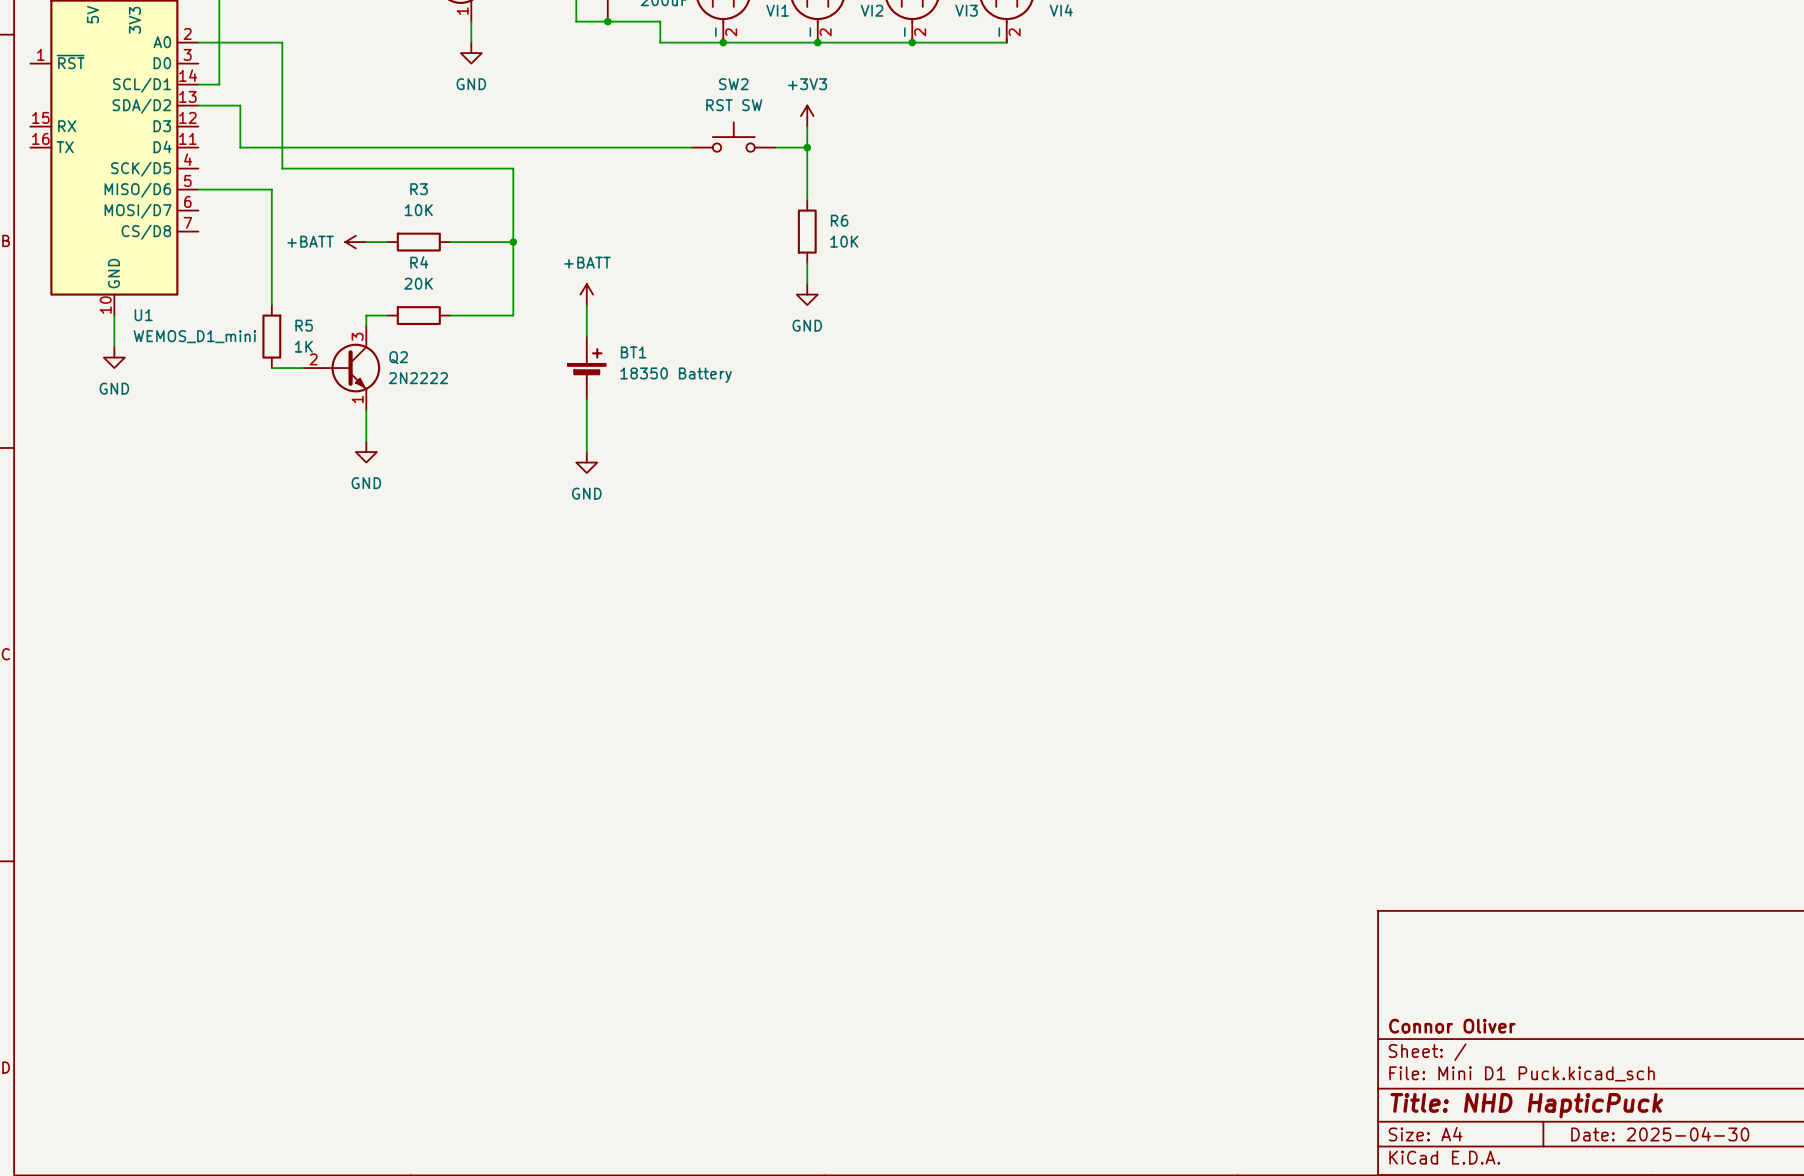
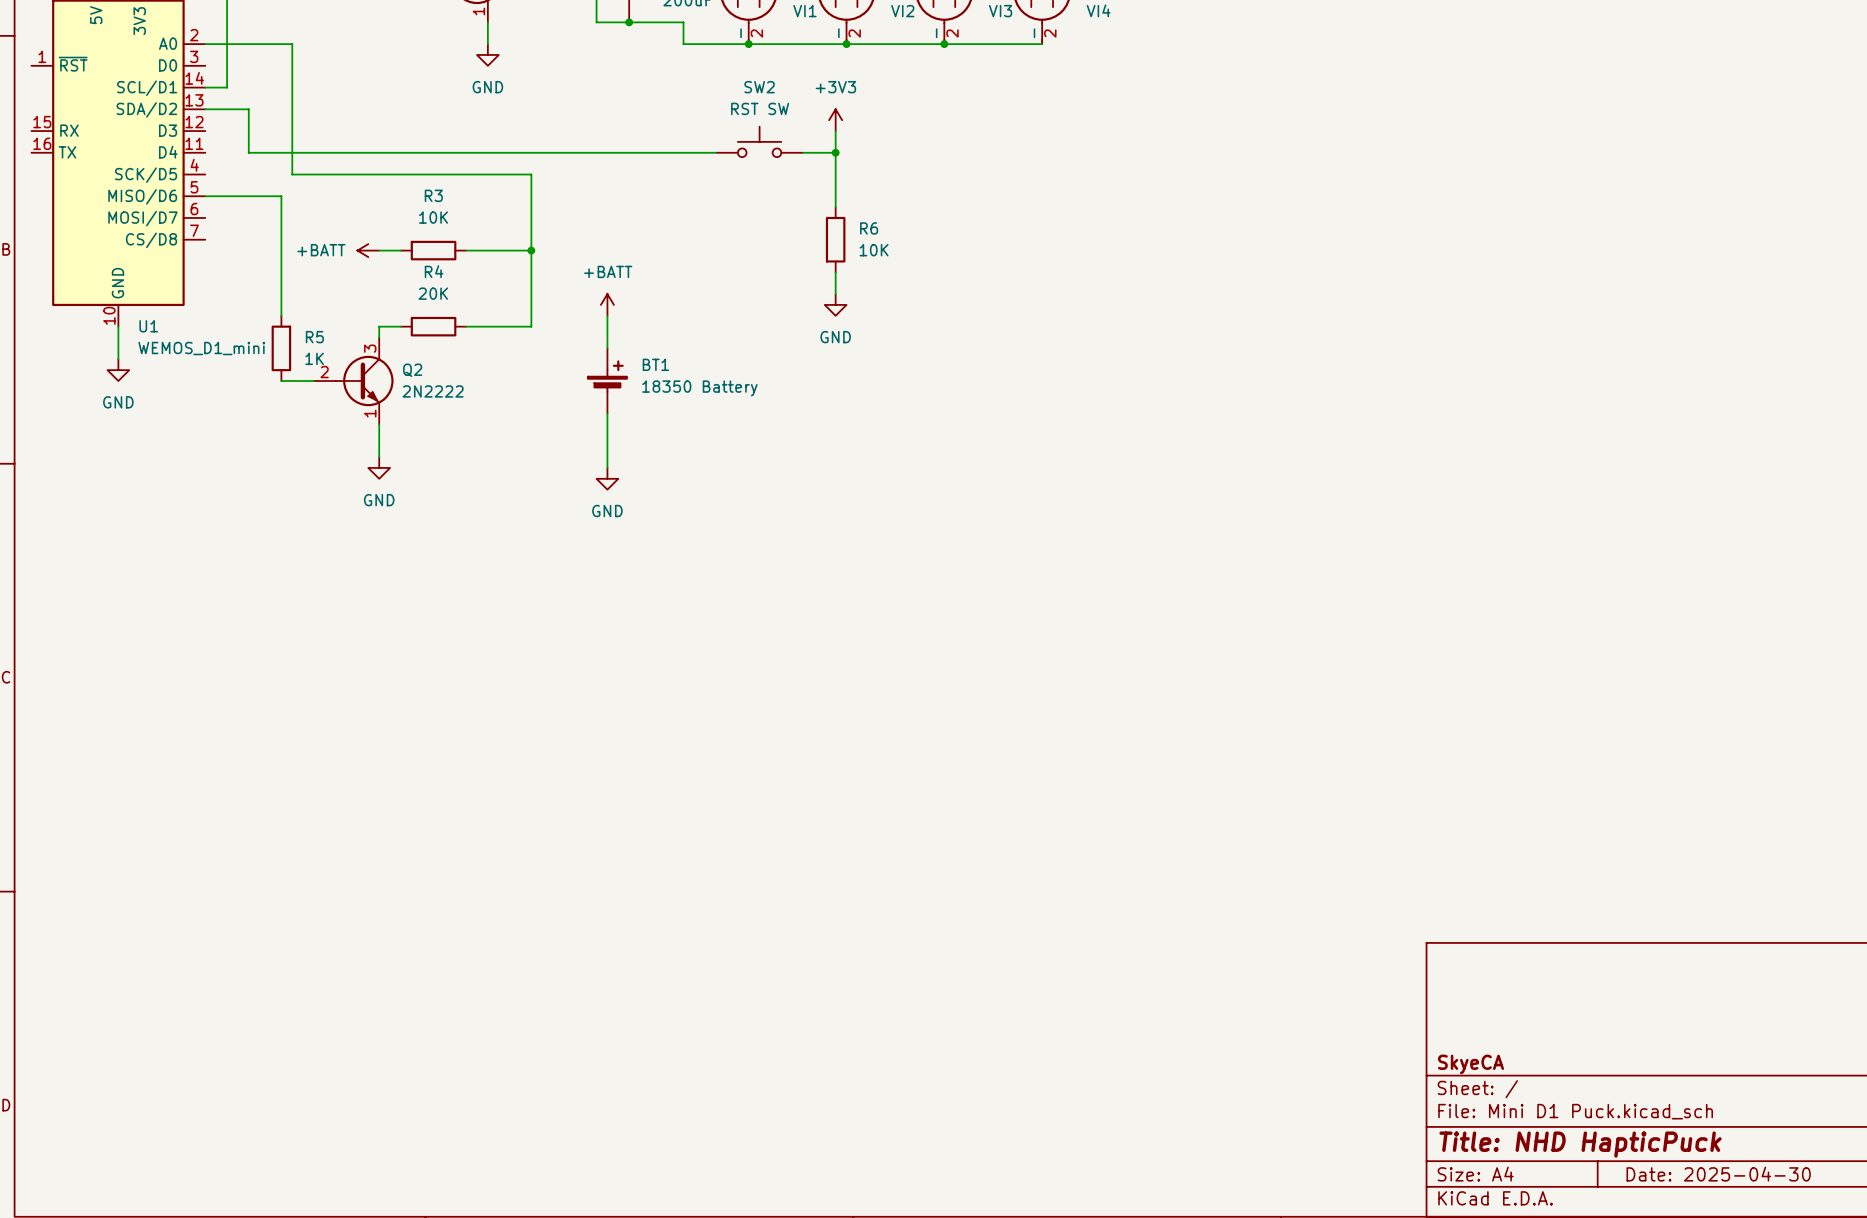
title block: Connor Oliver (1452, 1026) -> SkyeCA (1471, 1064)

